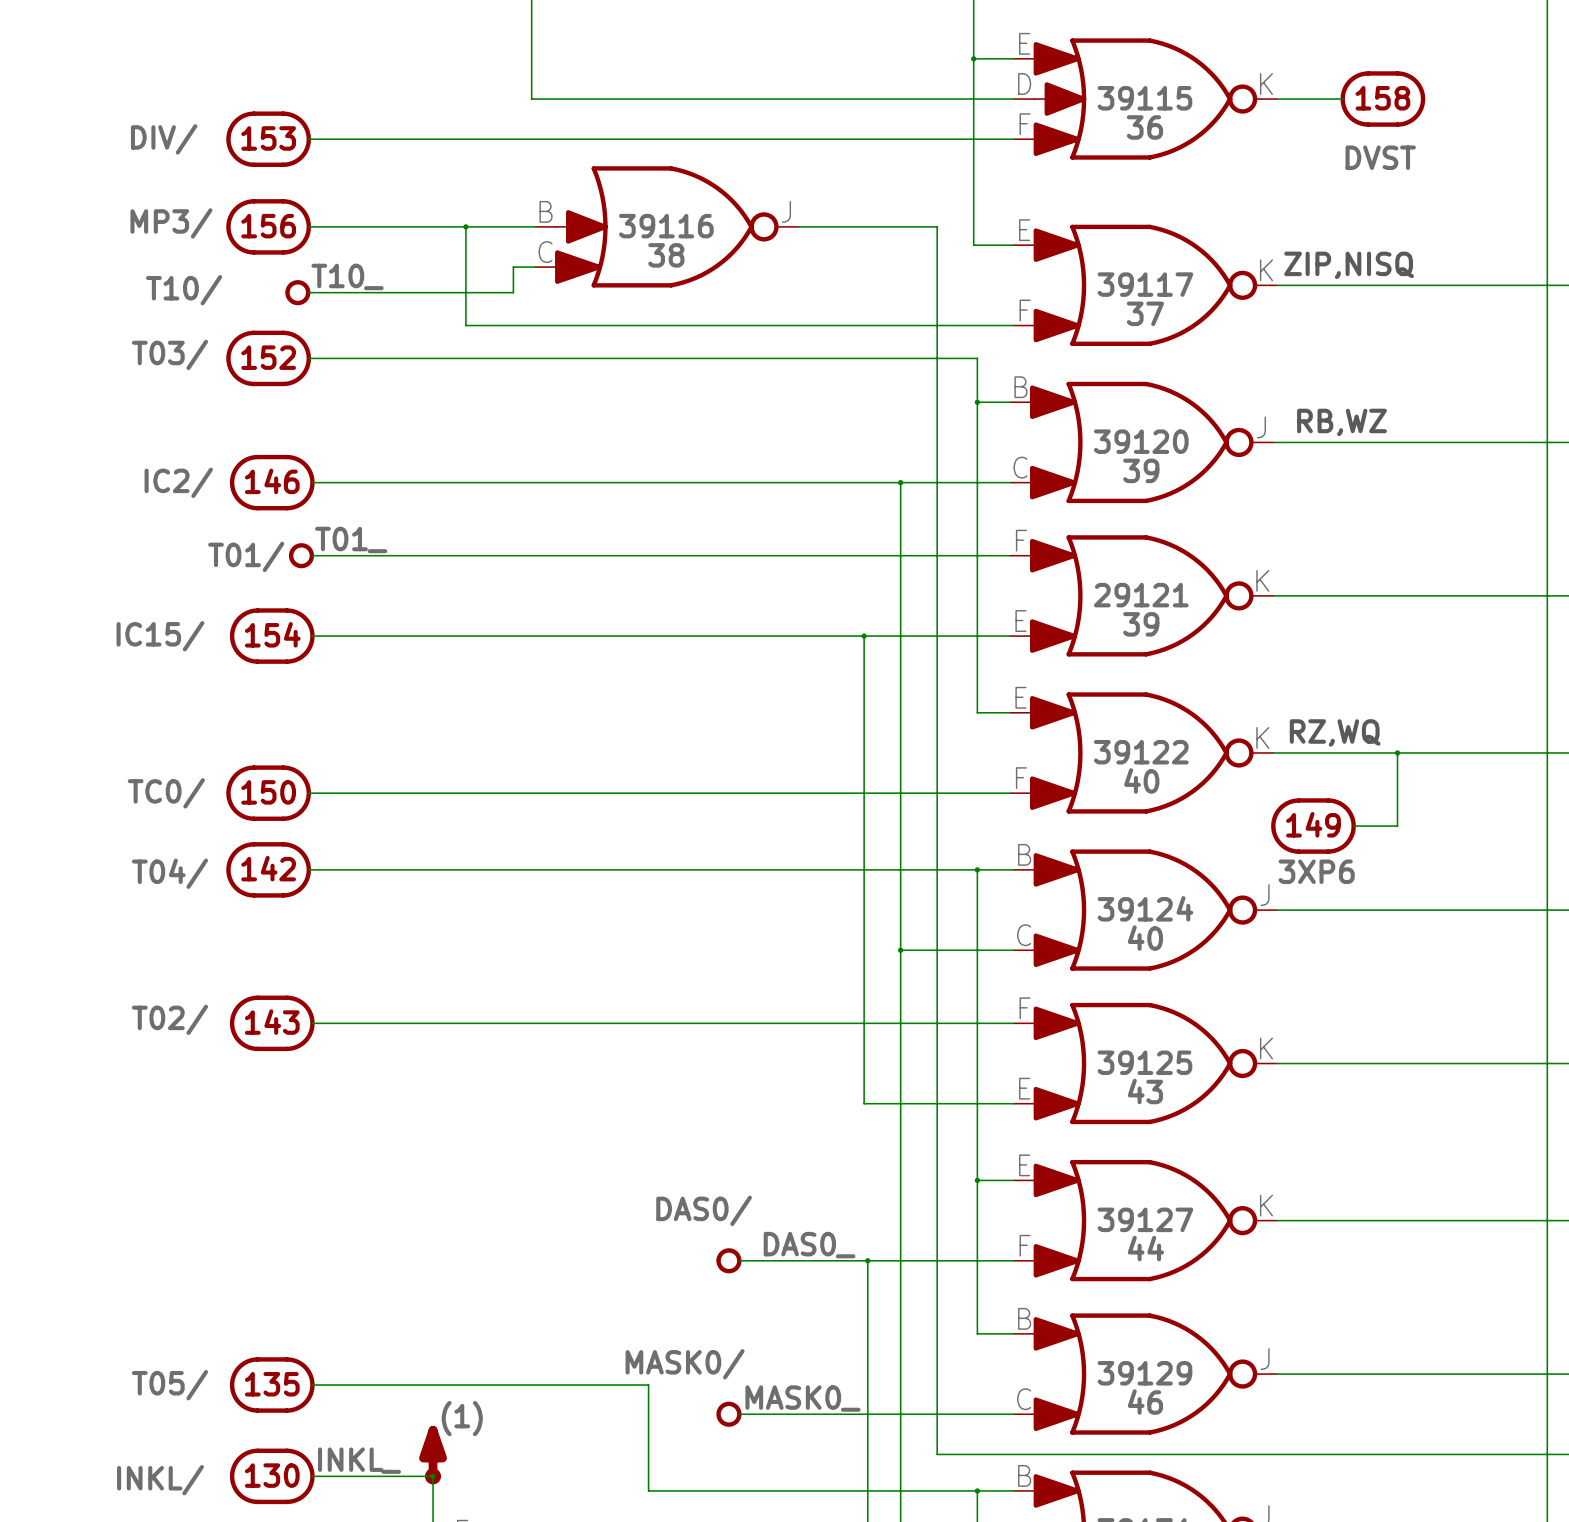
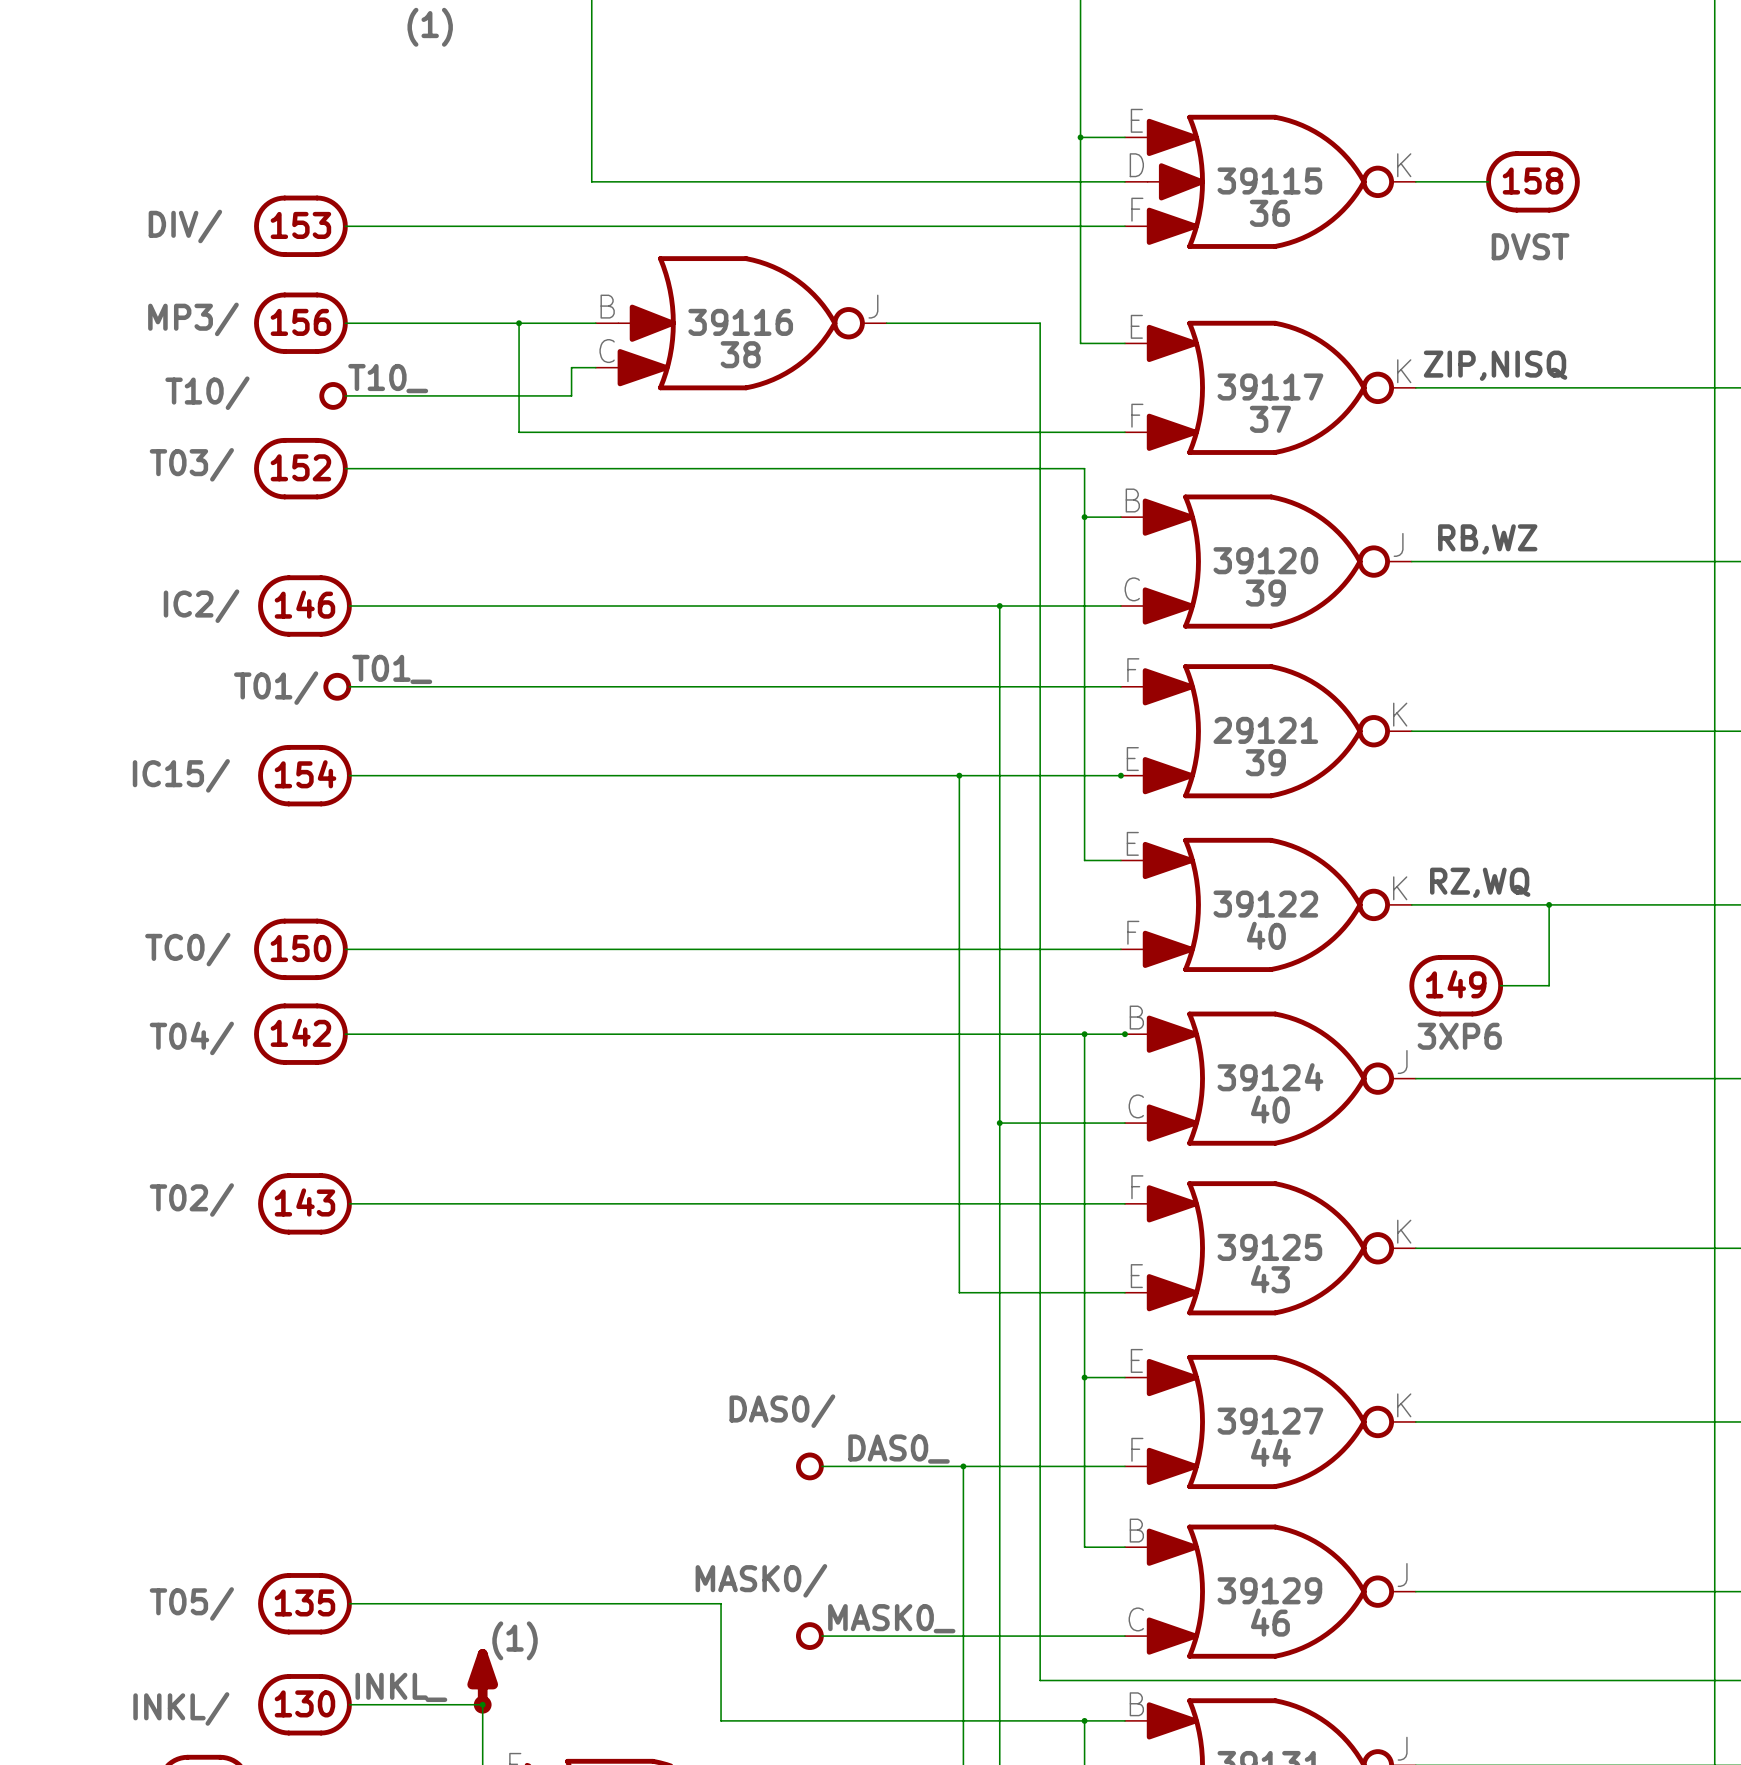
junction: none -> (1120, 775)
junction: none -> (1124, 1034)

